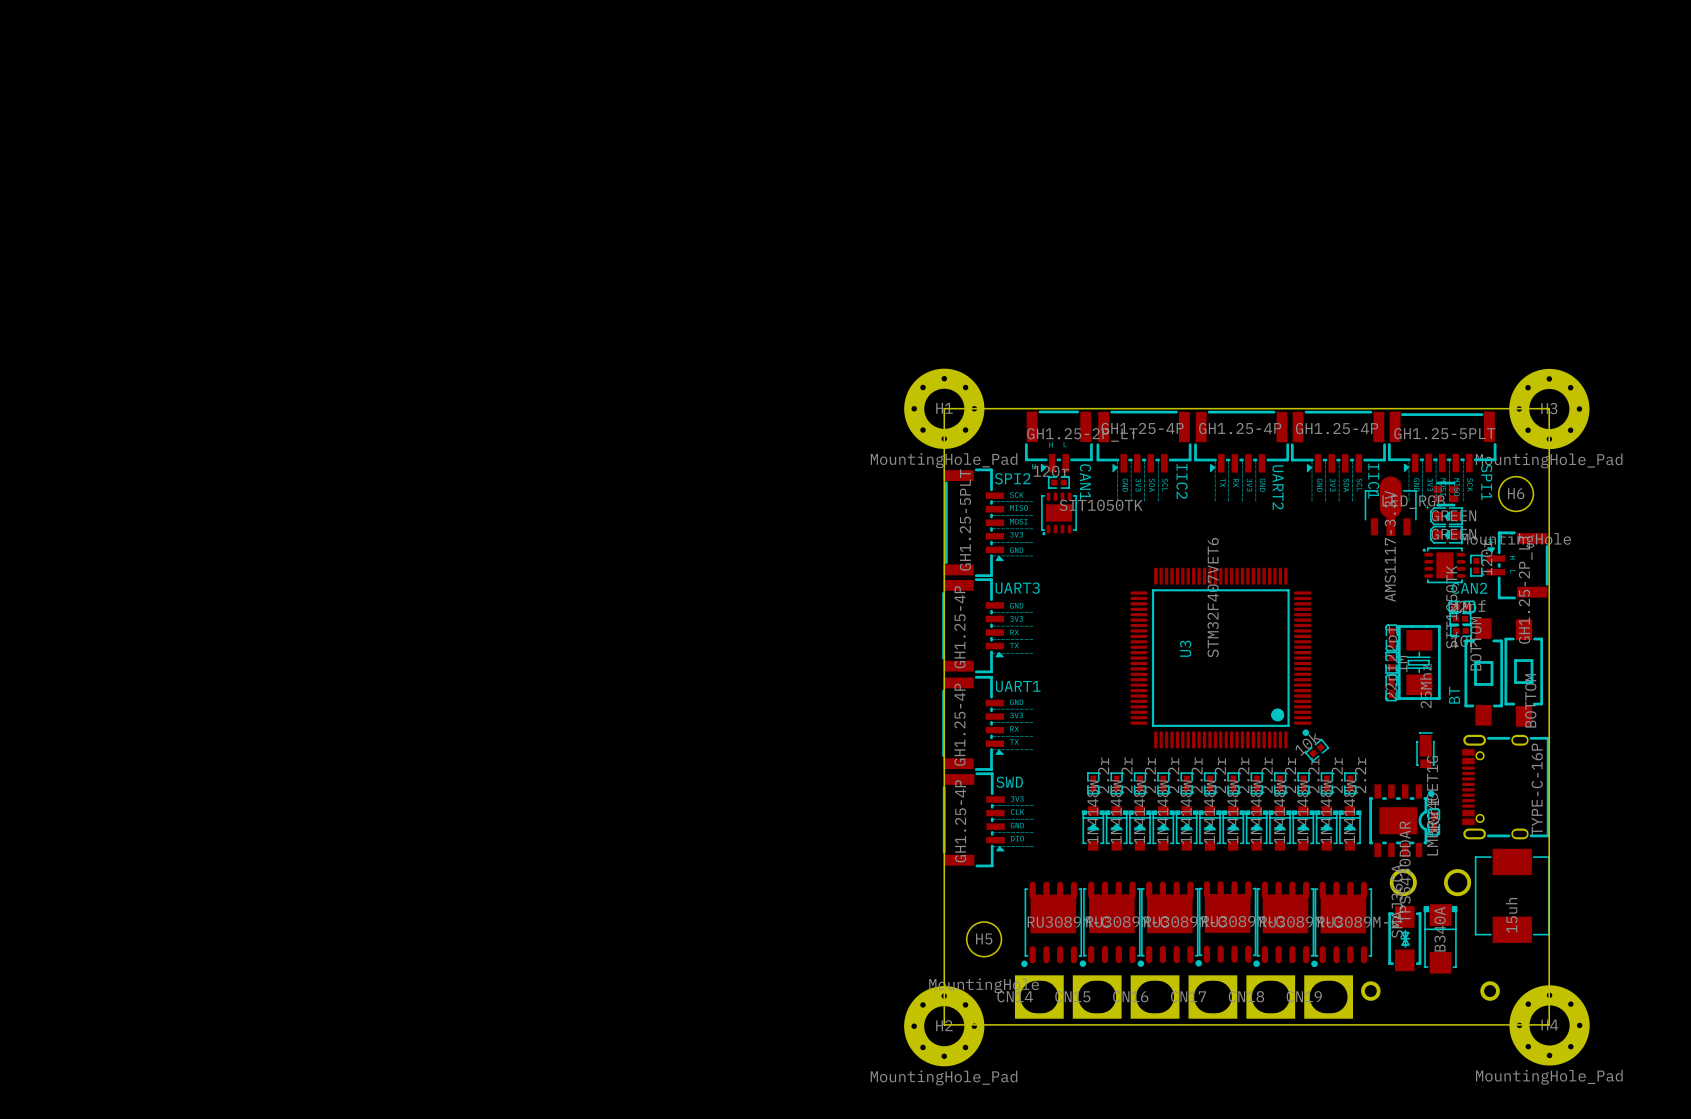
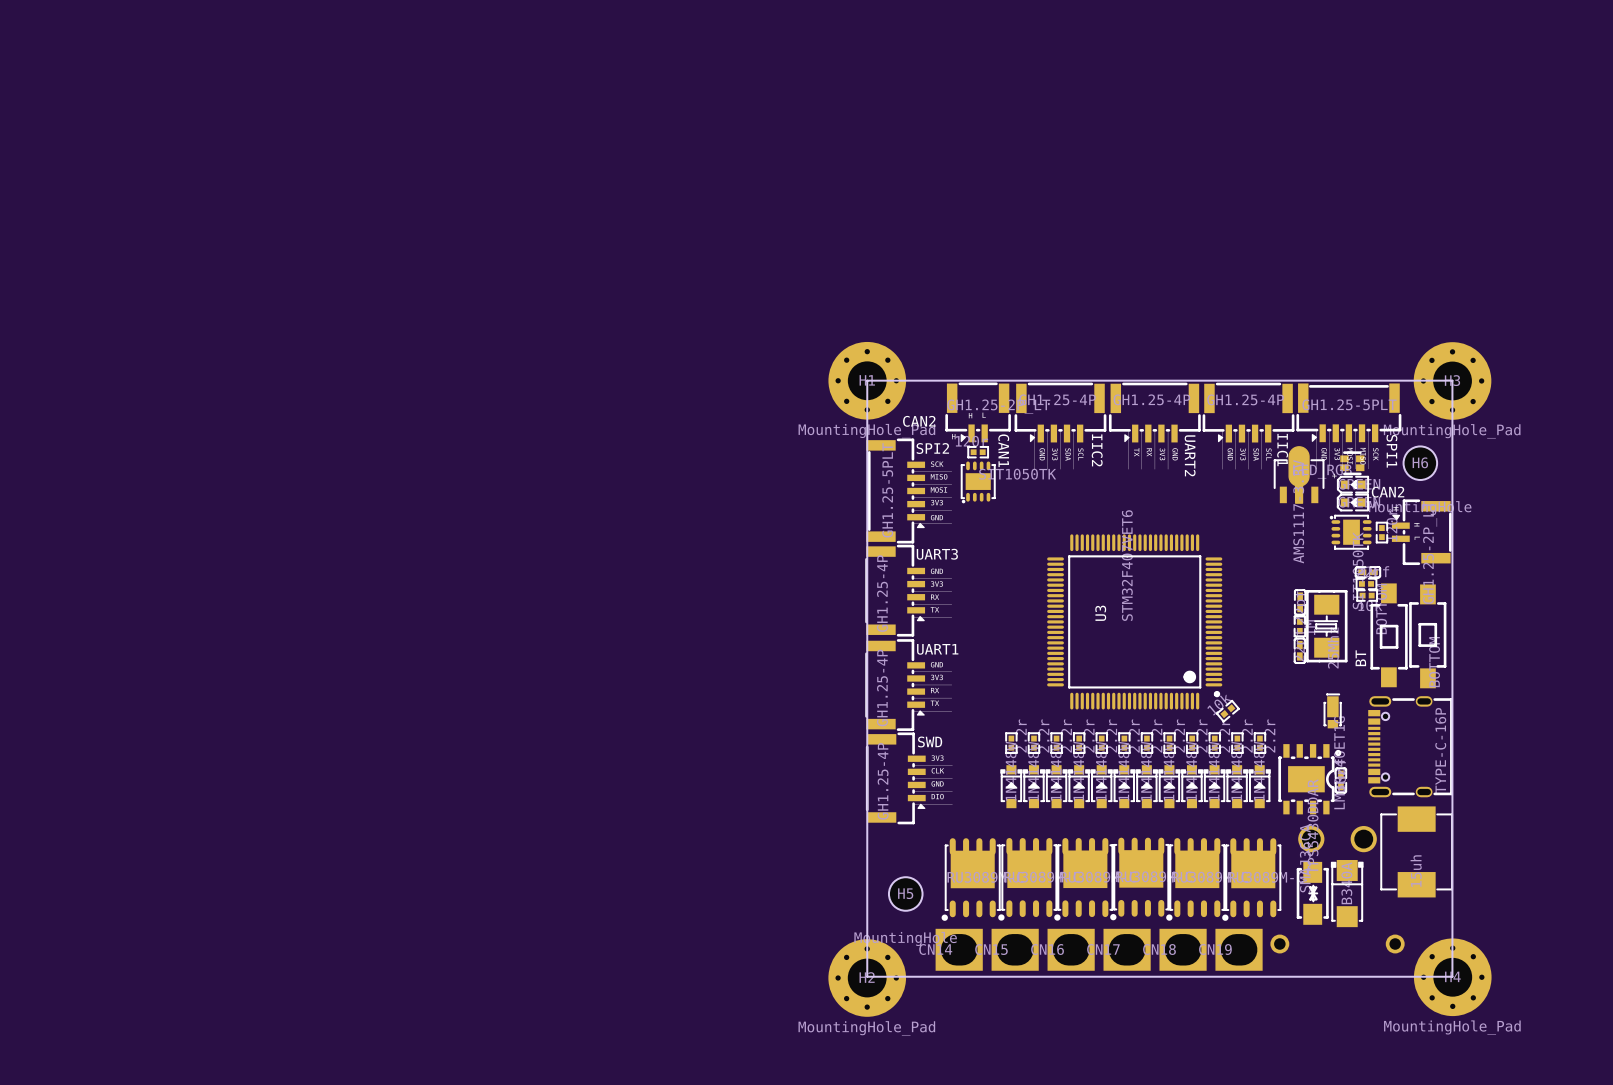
text: none -> CAN2 (919, 421)
text position: CAN2 (1469, 588) -> CAN2 (1388, 492)

